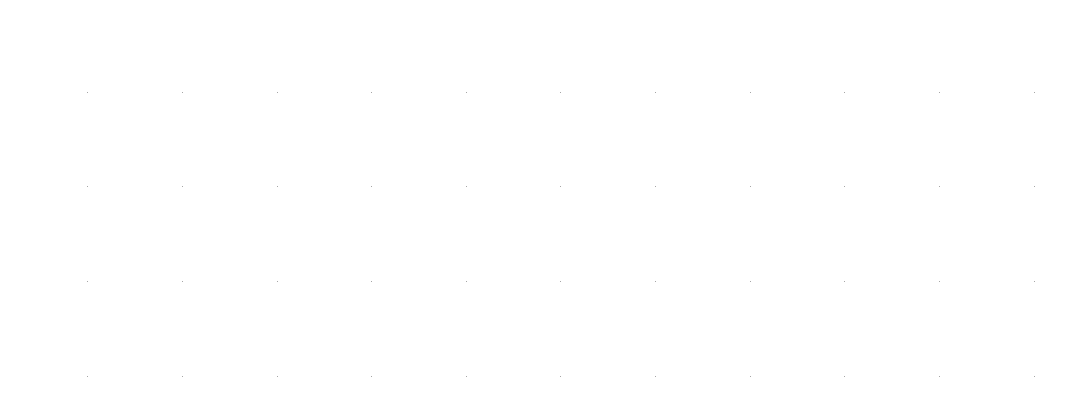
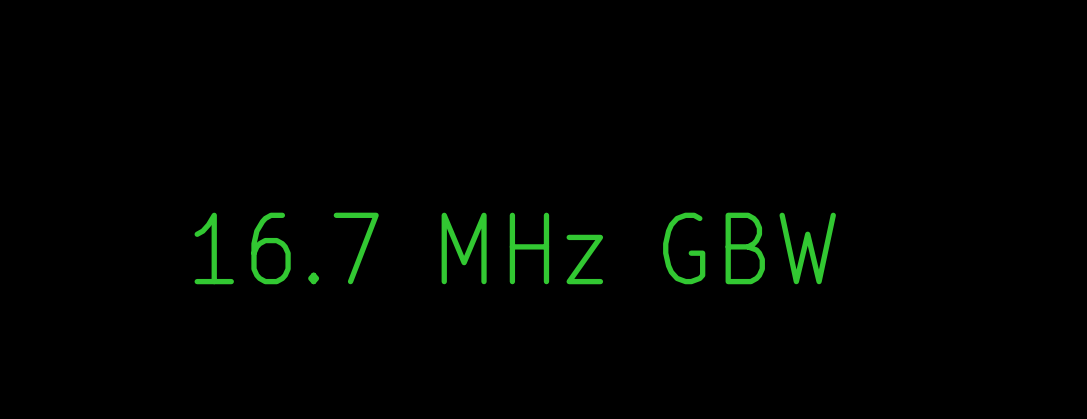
text: none -> 16.7 MHz GBW (515, 248)

